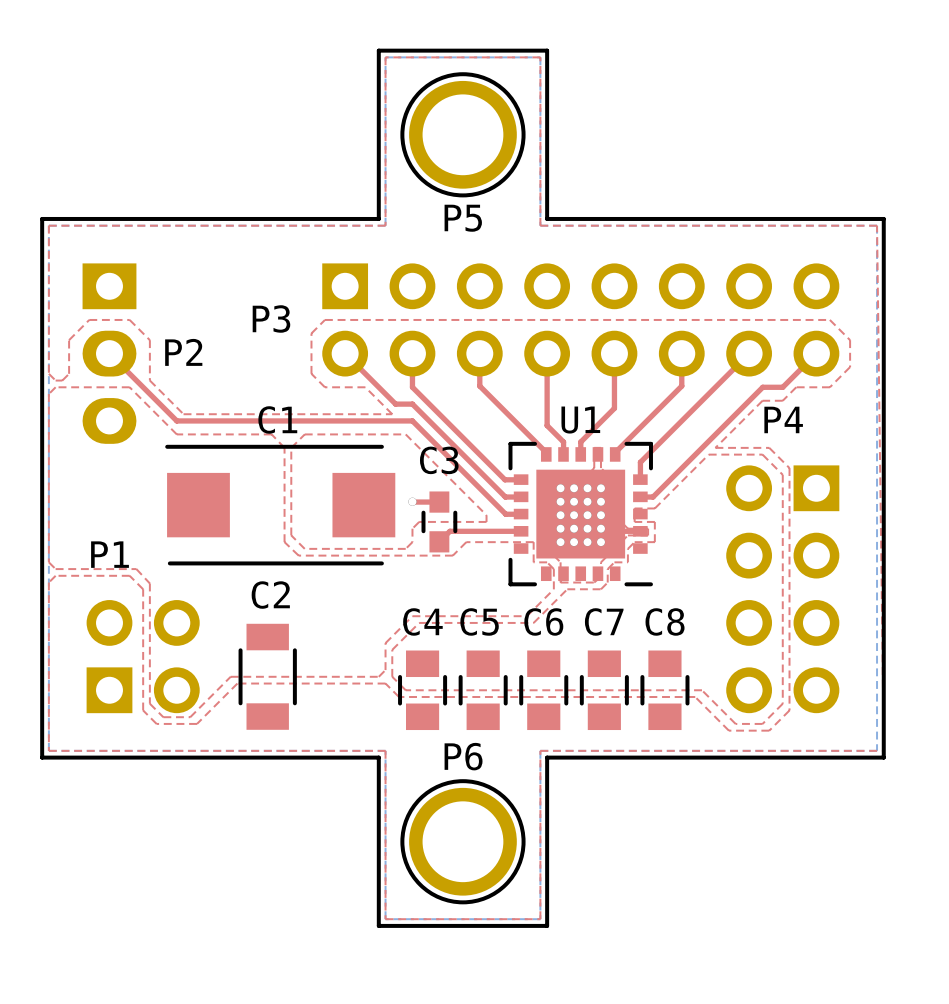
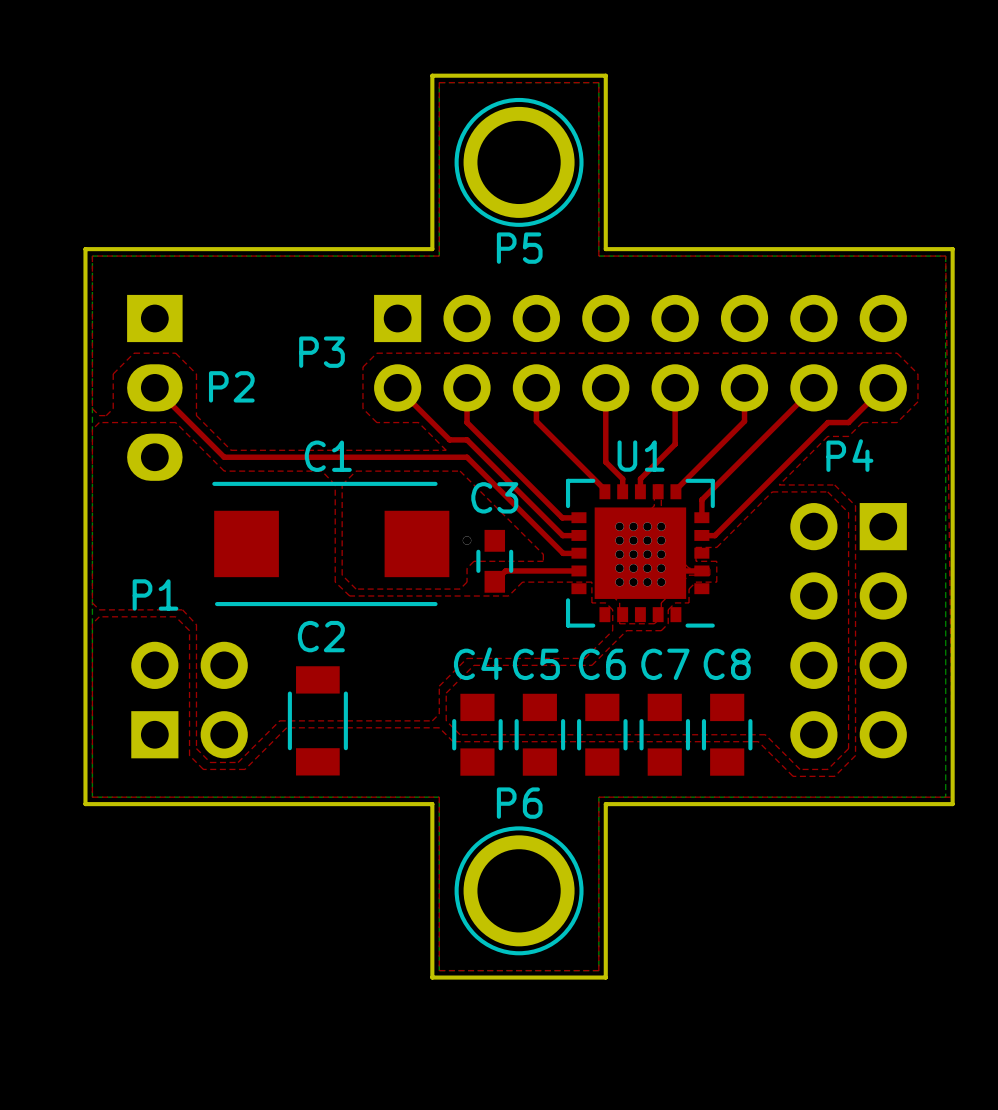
top track: (412, 502) (439, 502) -> none

